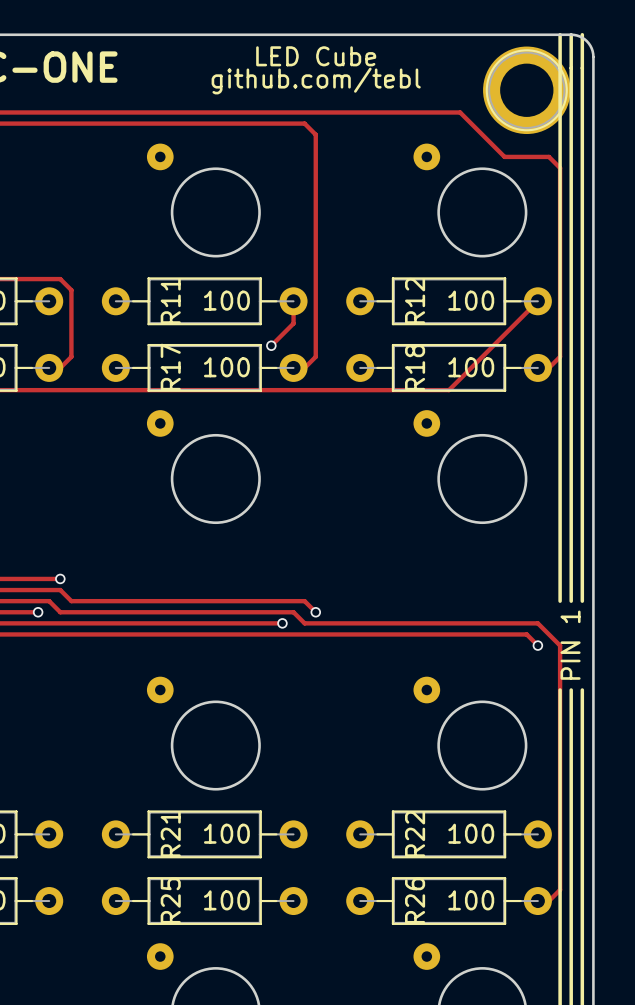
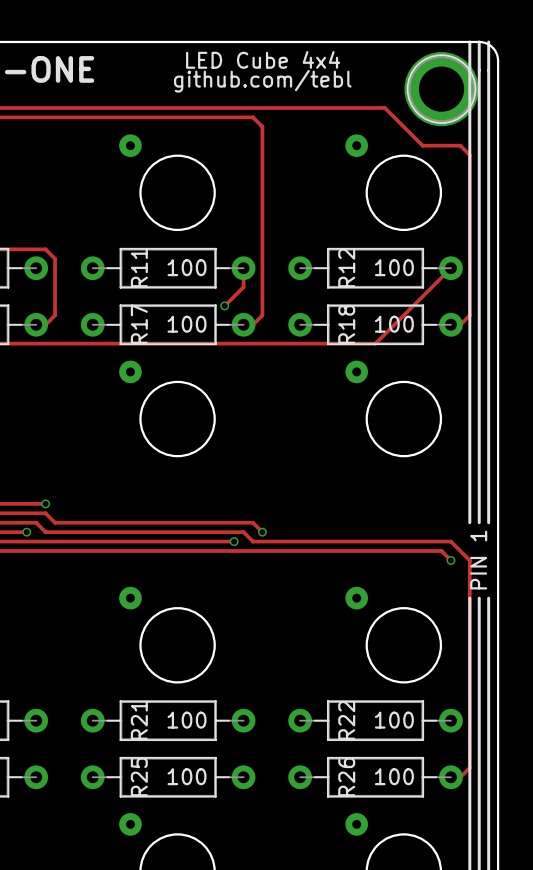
text: LED Cube (316, 56) -> LED Cube 4x4 (263, 59)

